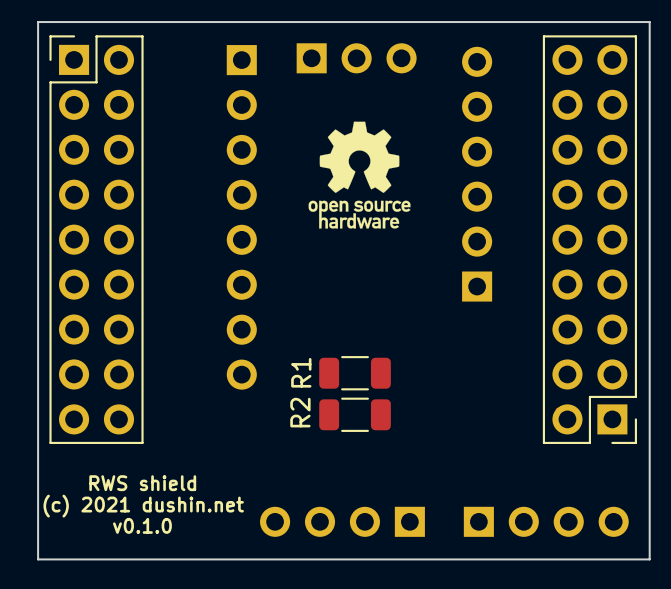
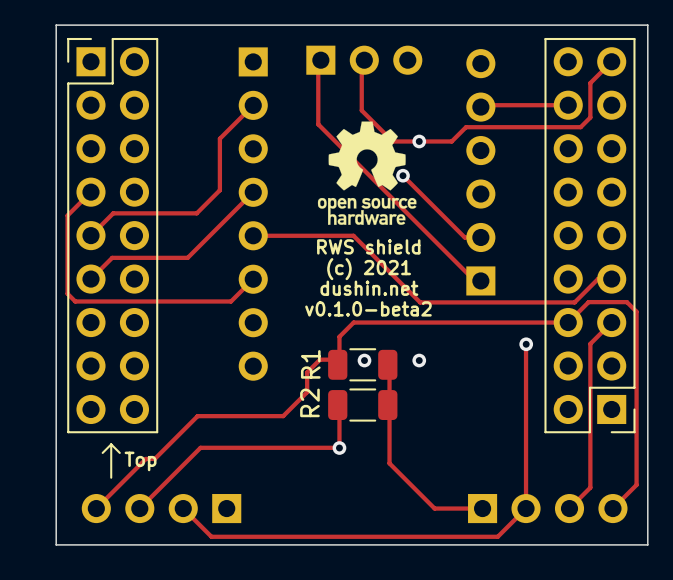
track: none -> (318, 60) (318, 124) (473, 279)
track: none -> (361, 60) (361, 110) (392, 141) (451, 141) (466, 127) (580, 127) (590, 117) (590, 83) (611, 61)
track: none -> (473, 105) (568, 105) (566, 107)
track: none -> (253, 105) (219, 138) (219, 190) (196, 213) (113, 213) (90, 235)
via: none -> (419, 141)
track: none -> (402, 175) (464, 237) (480, 237)
via: none -> (402, 175)
track: none -> (90, 192) (67, 215) (67, 293) (75, 301) (231, 301) (253, 279)
track: none -> (253, 192) (187, 257) (112, 257) (90, 279)
track: none -> (253, 235) (353, 235) (420, 302) (574, 302) (598, 279) (611, 279)
text: none -> (c) 2021 (369, 269)
text: none -> dushin.net (369, 288)
text: none -> v0.1.0-beta2 (368, 308)
track: none -> (611, 322) (590, 343) (590, 487) (569, 508)
via: none -> (526, 344)
track: none -> (526, 344) (526, 508) (497, 536) (211, 536) (183, 508)
track: none -> (389, 359) (389, 463) (434, 508) (482, 508)
via: none -> (364, 360)
via: none -> (419, 360)
track: none -> (339, 403) (339, 448)
line: none -> (111, 444) (102, 452)
line: none -> (111, 444) (119, 452)
line: none -> (111, 444) (111, 477)
track: none -> (339, 447) (200, 447) (139, 508)
via: none -> (339, 448)
text: none -> Top (140, 461)
text position: RWS shield (142, 483) -> RWS shield (368, 246)
text: (c) 2021 dushin.net (143, 506) -> none
track: none -> (96, 508) (145, 458) (154, 458) (197, 416) (283, 416) (307, 392) (307, 372) (320, 359) (339, 359) (339, 336) (353, 322) (568, 322) (588, 302) (626, 302) (636, 311) (636, 484) (612, 508)
part position: (342, 521) -> (161, 508)
text: v0.1.0 (142, 525) -> none

